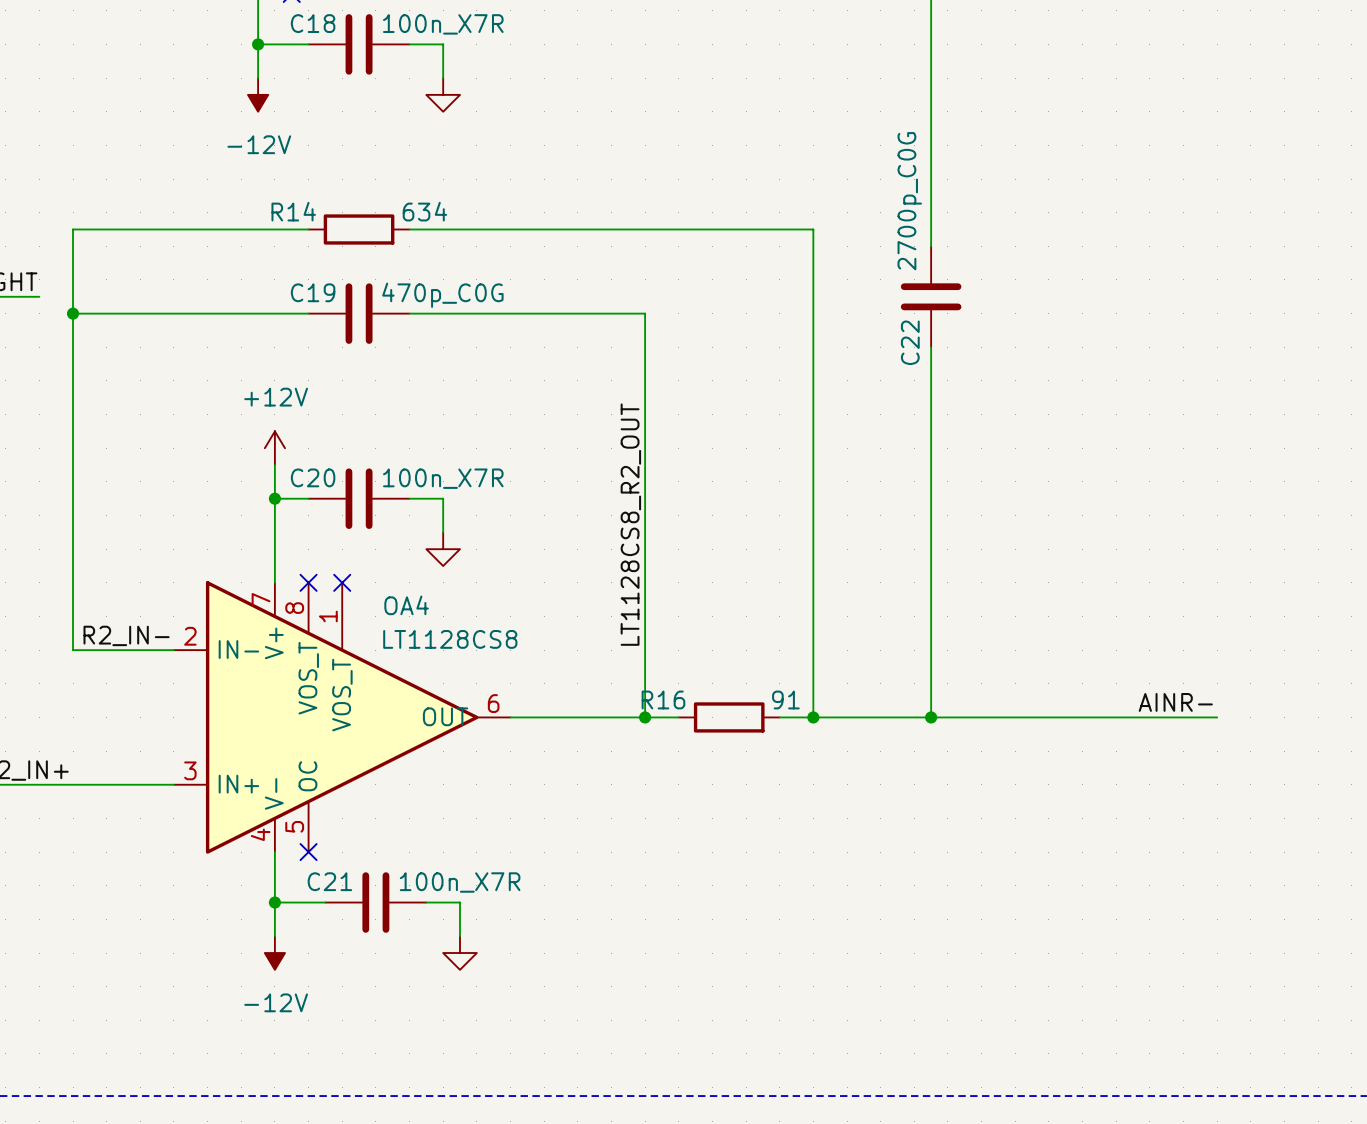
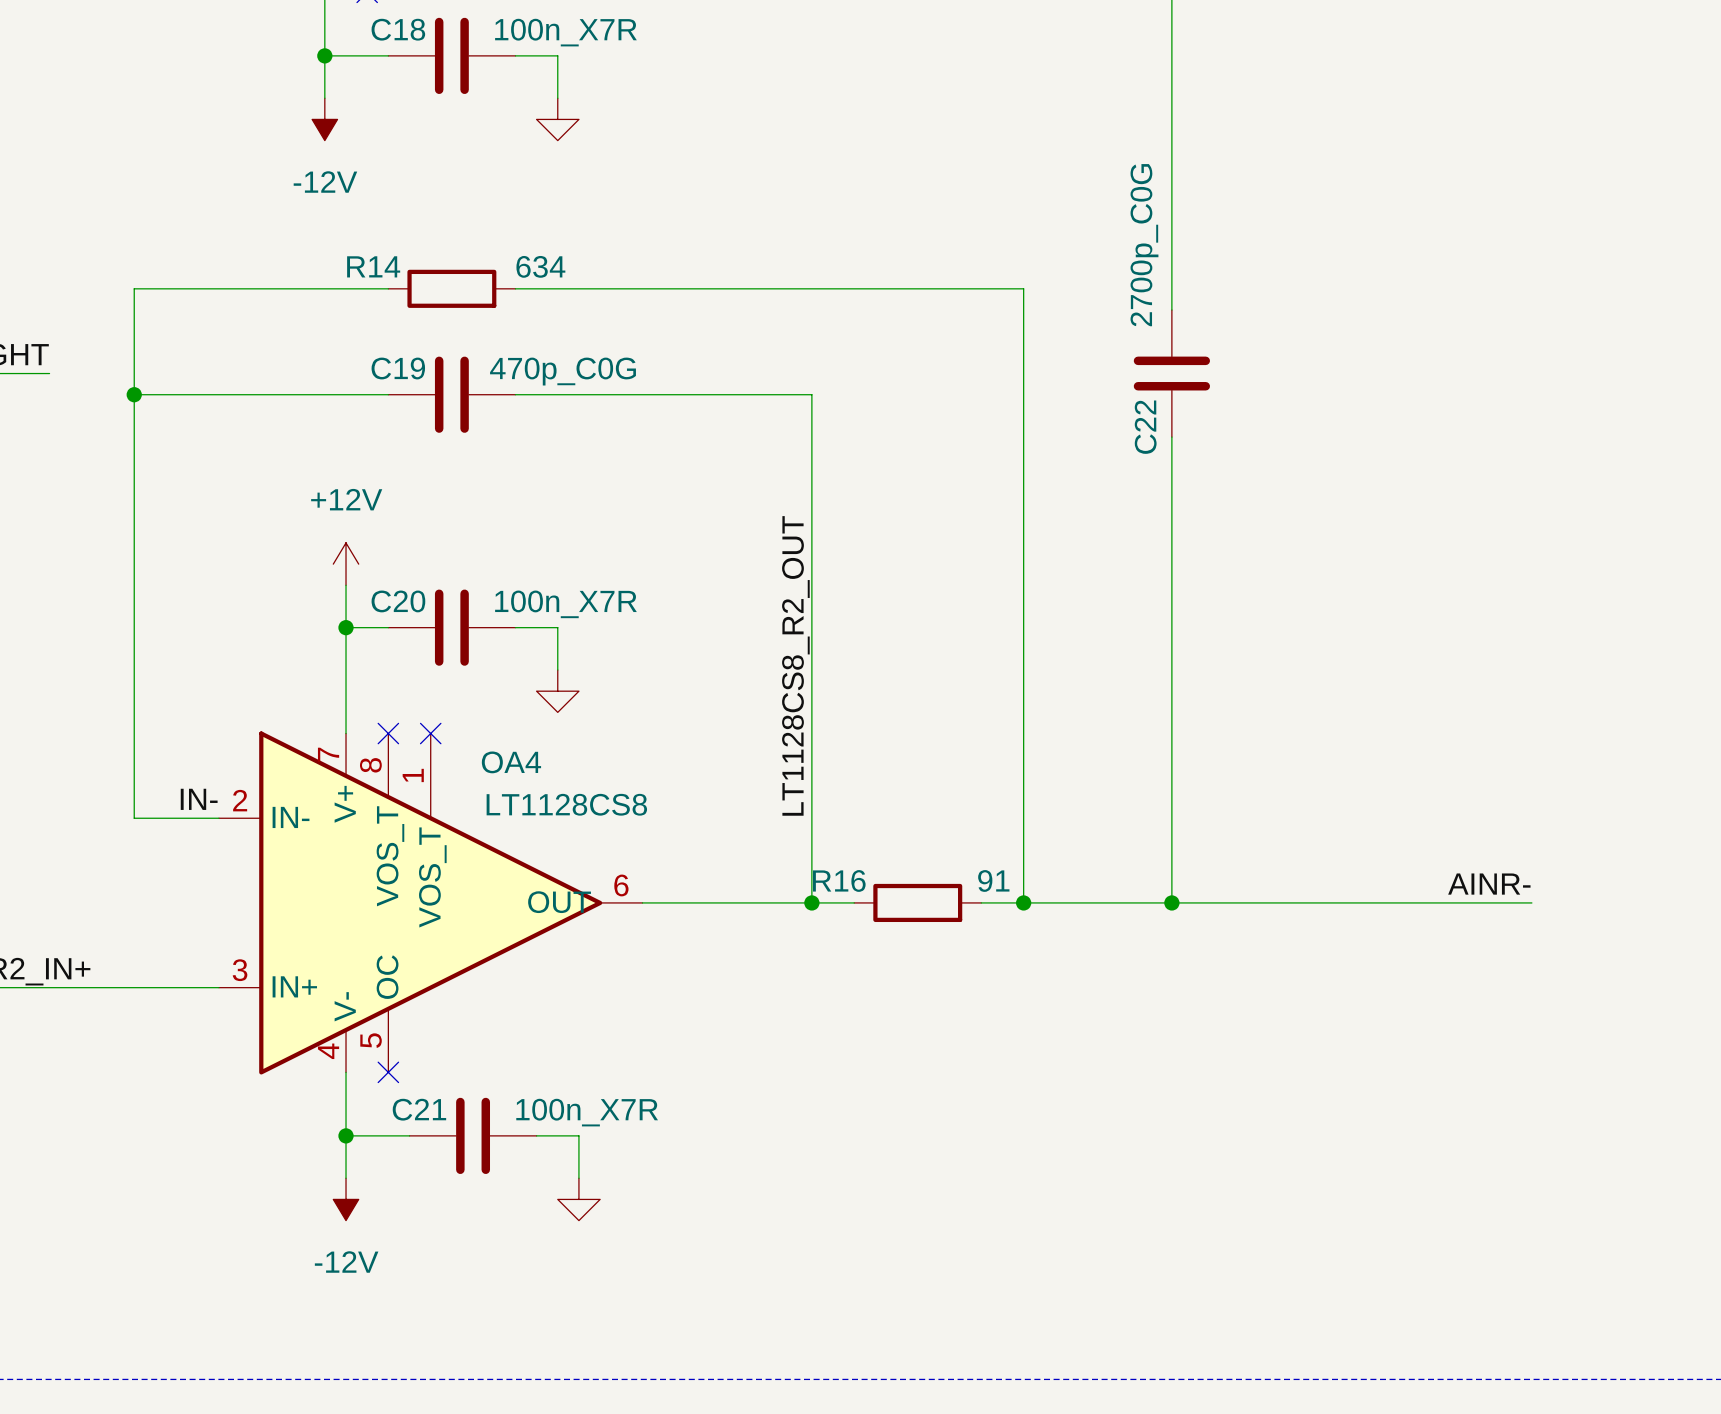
wire: (106, 229) (73, 229) (73, 650) (106, 650) -> (134, 288) (134, 818)
wire: (73, 313) (106, 313) -> none
junction position: (73, 313) -> (134, 394)
label: R2_IN- (126, 635) -> IN- (199, 799)

